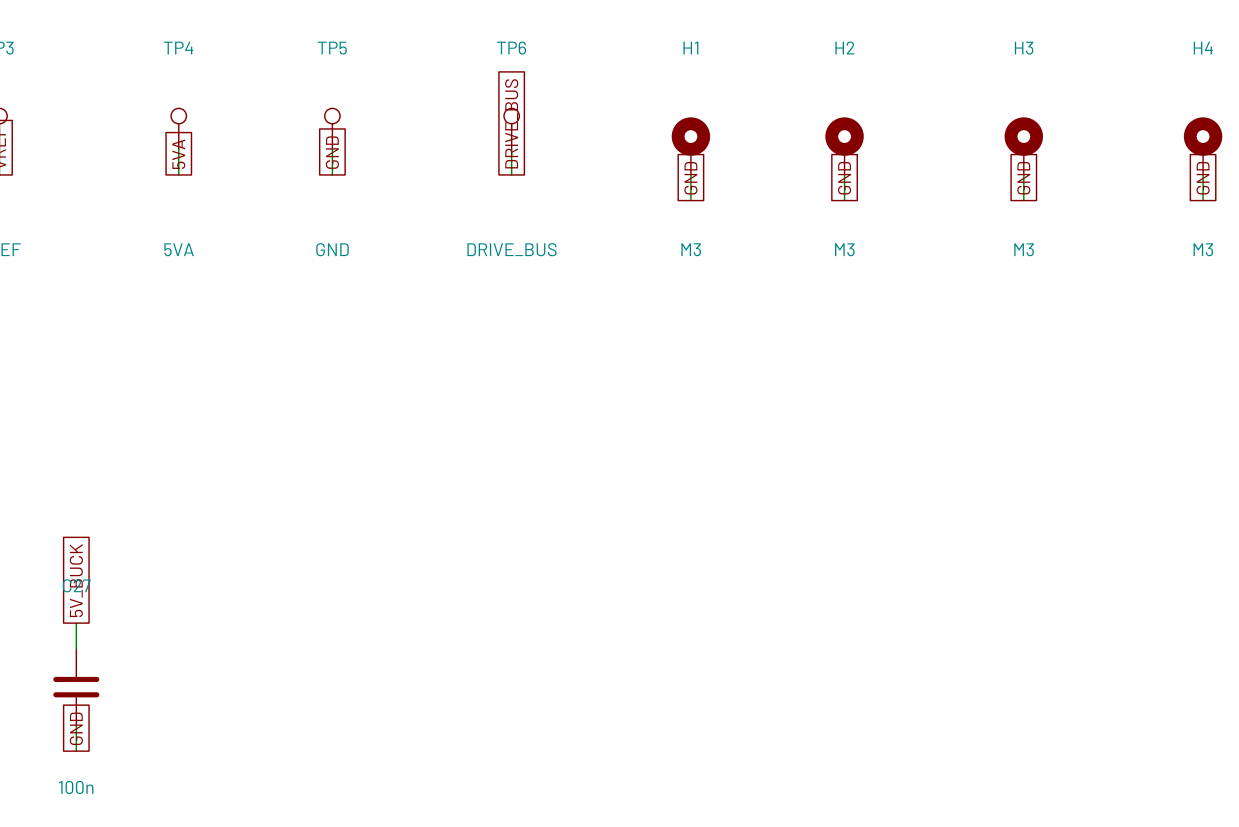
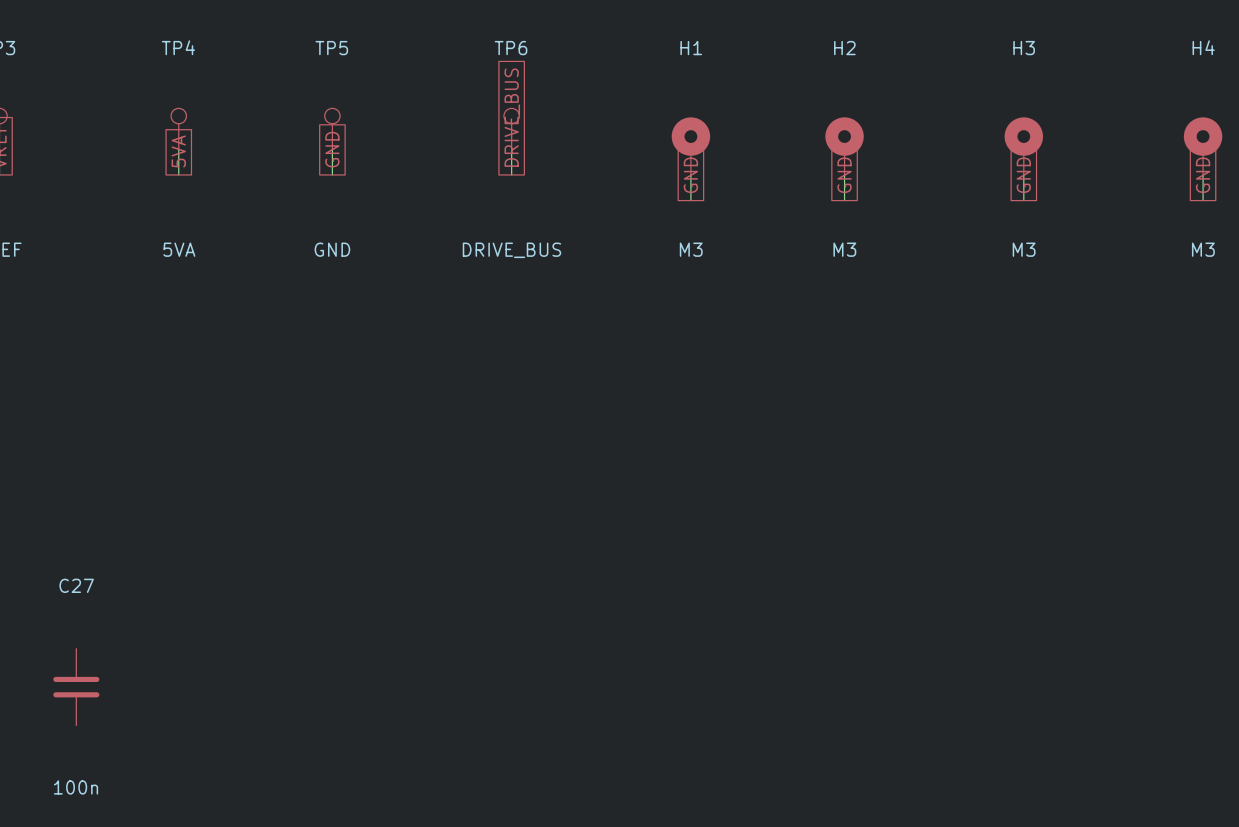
global label: 5V_BUCK (76, 580) -> none
wire: (76, 623) (76, 648) -> none
wire: (76, 725) (76, 751) -> none
global label: GND (76, 728) -> none

